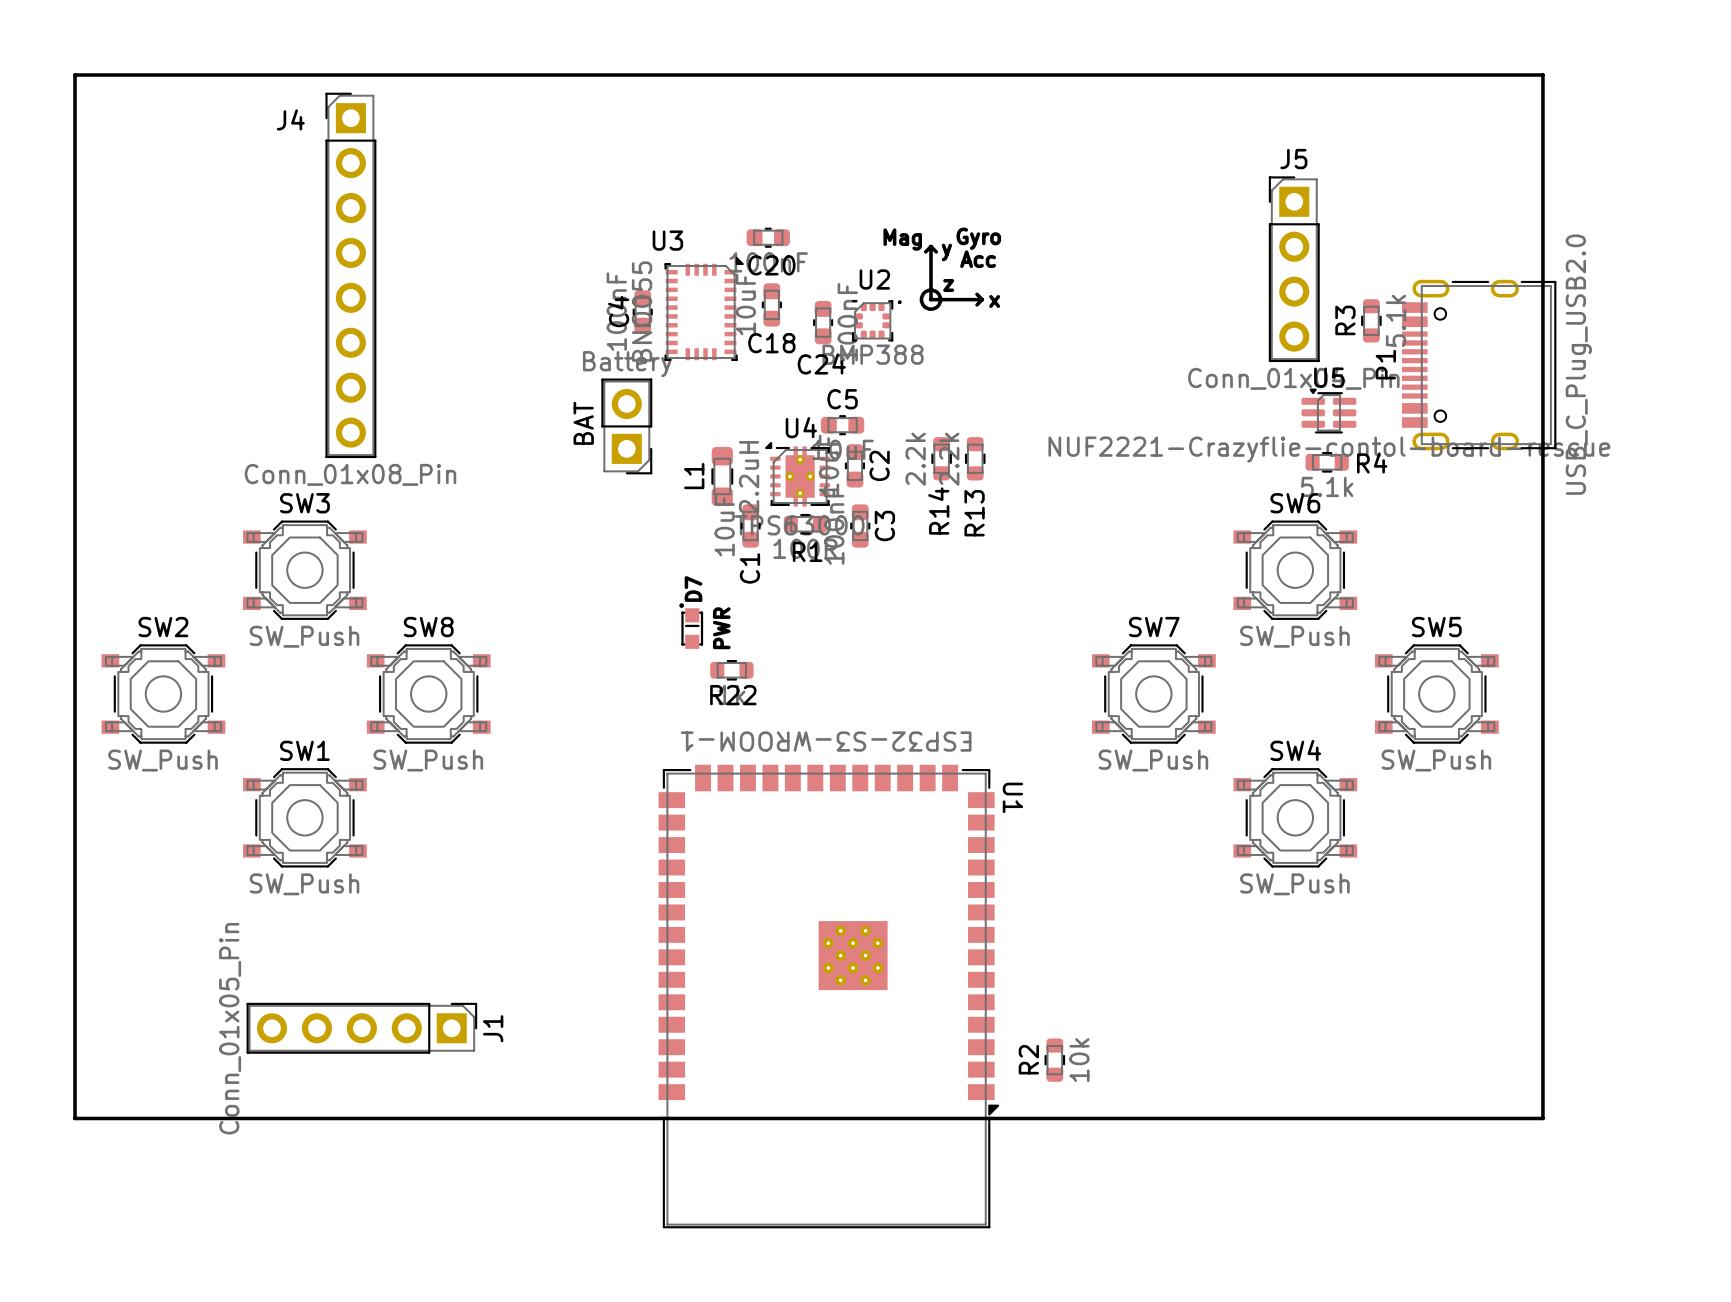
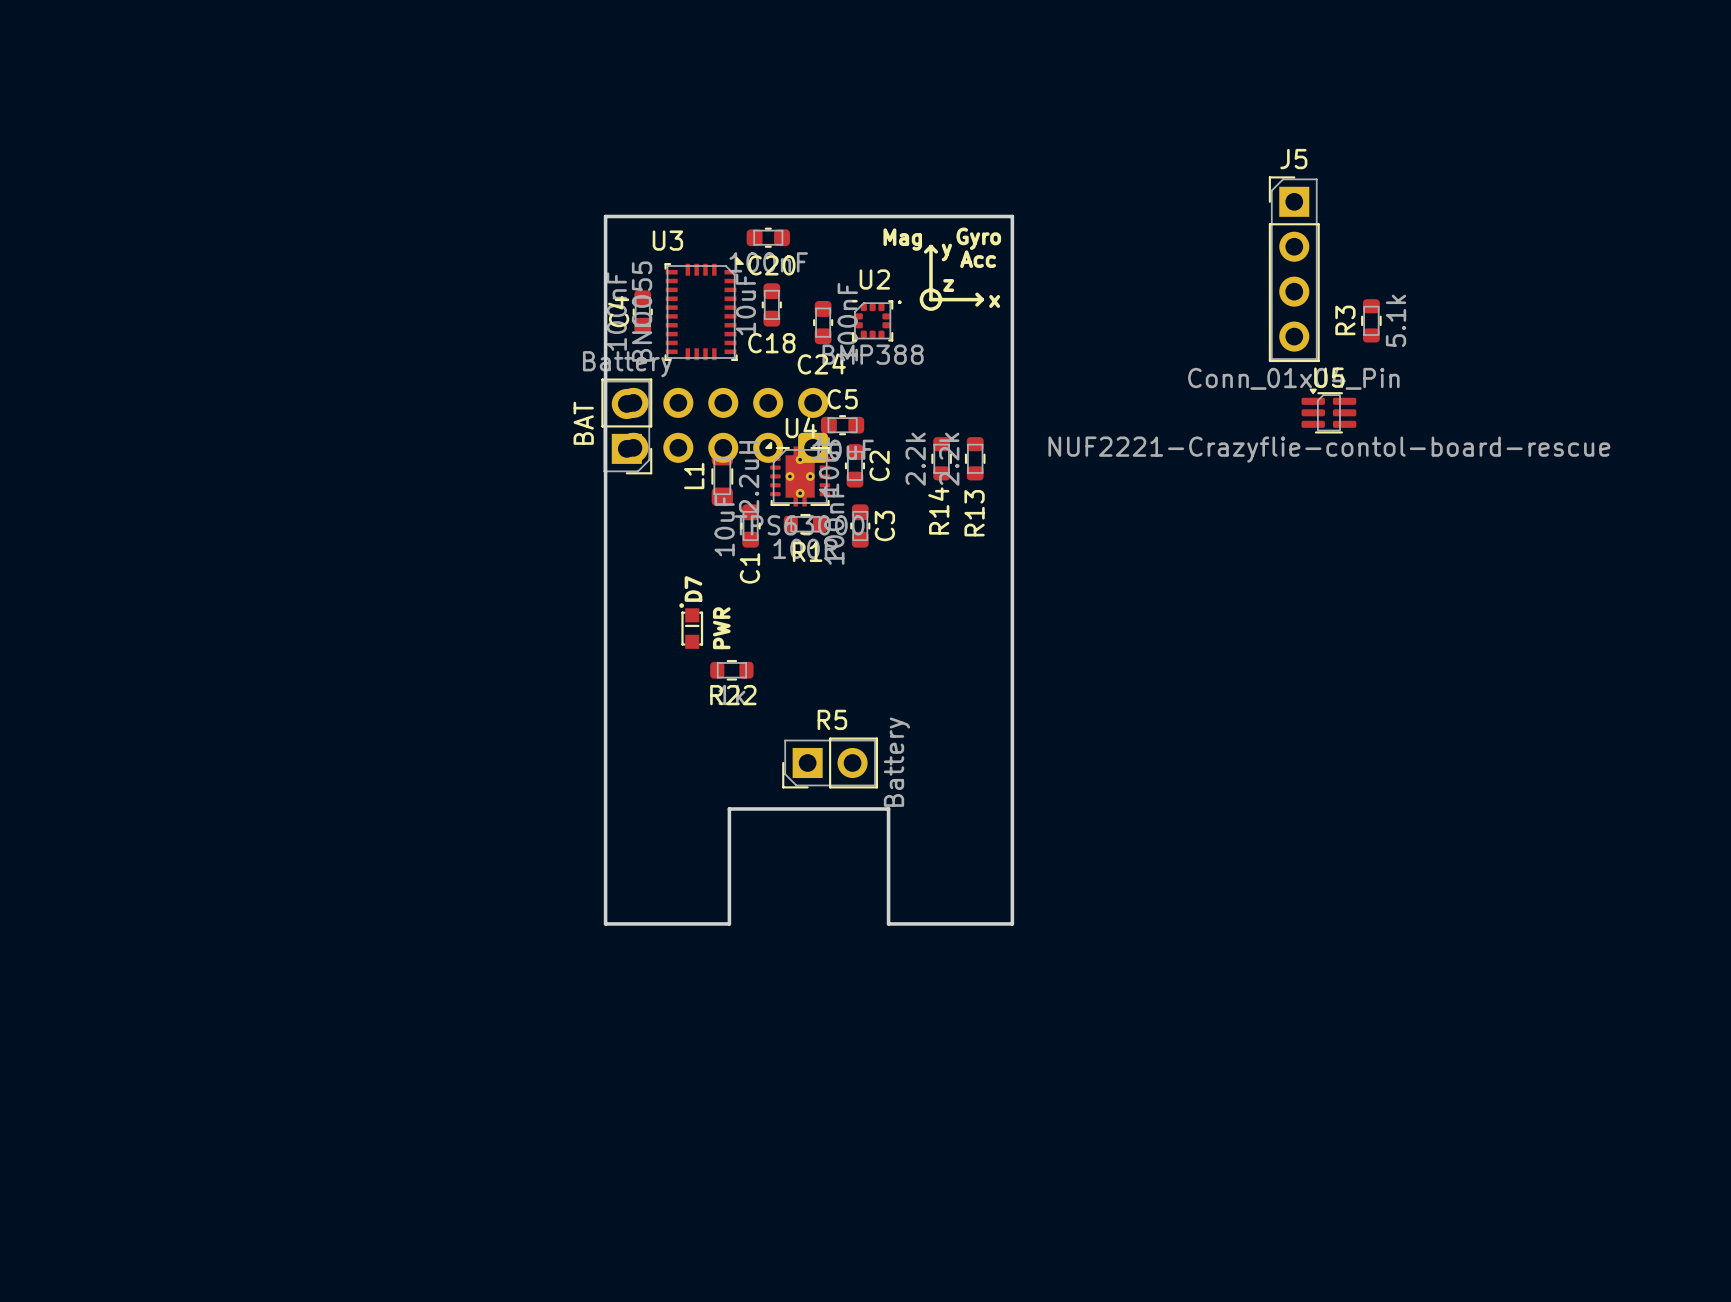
board edge: (75, 75) (1542, 75) (1542, 1118) (75, 1118) (75, 75) -> none
board edge: none -> (605, 216) (1012, 216) (1012, 923) (888, 923) (888, 808) (729, 808) (729, 923) (605, 923) (605, 216)
J4: Conn_01x08_Pin (350, 275) -> none
P1: USB_C_Plug_USB2.0 (1479, 365) -> none
part: none -> (723, 425)
R4: 5.1k (1327, 462) -> none
SW3: SW_Push (304, 570) -> none
SW6: SW_Push (1295, 570) -> none
SW2: SW_Push (163, 694) -> none
SW8: SW_Push (428, 694) -> none
SW7: SW_Push (1153, 694) -> none
SW5: SW_Push (1436, 694) -> none
R5: none -> Battery (830, 762)
SW1: SW_Push (304, 817) -> none
SW4: SW_Push (1295, 817) -> none
U1: ESP32-S3-WROOM-1 (828, 996) -> none
J1: Conn_01x05_Pin (361, 1028) -> none
R2: 10k (1054, 1060) -> none

